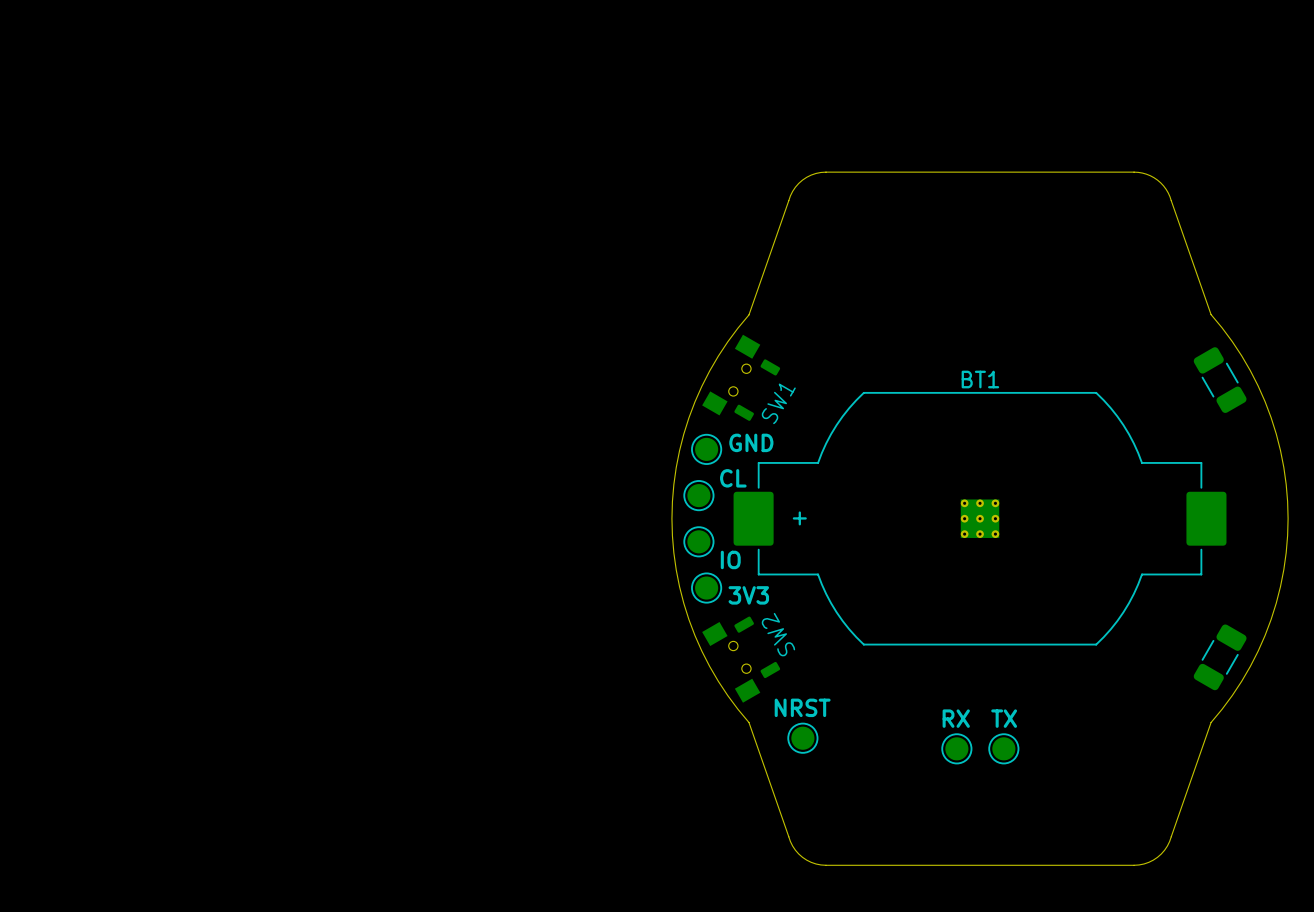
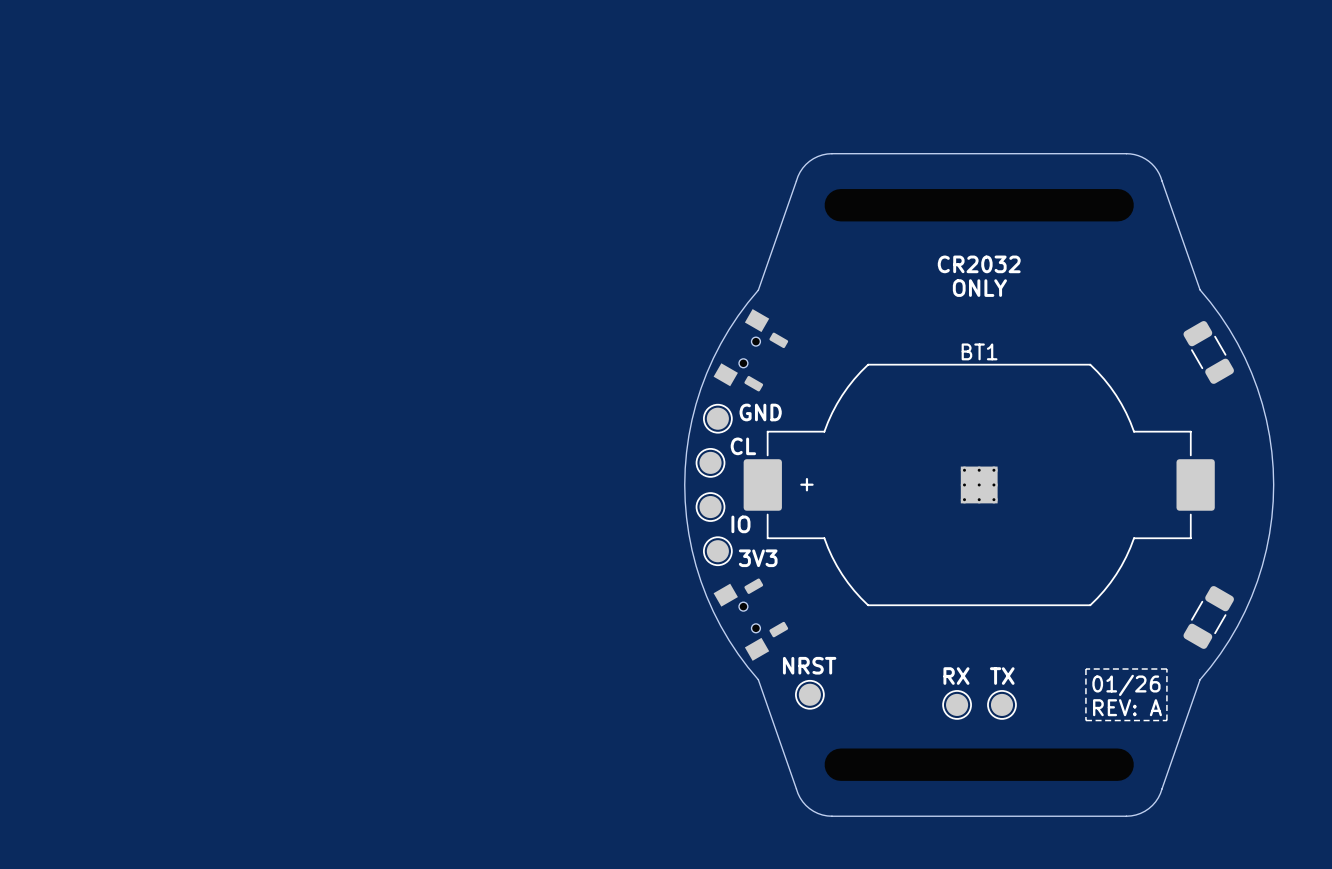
text: none -> CR2032 (979, 264)
text: none -> ONLY (979, 288)
SW1 name: SW1 (778, 403) -> none
SW2 name: SW2 (778, 634) -> none
line: none -> (1166, 669) (1085, 669) (1085, 720) (1166, 720) (1166, 669)
text: none -> 01/26 (1126, 685)
text: none -> REV: A (1127, 707)

